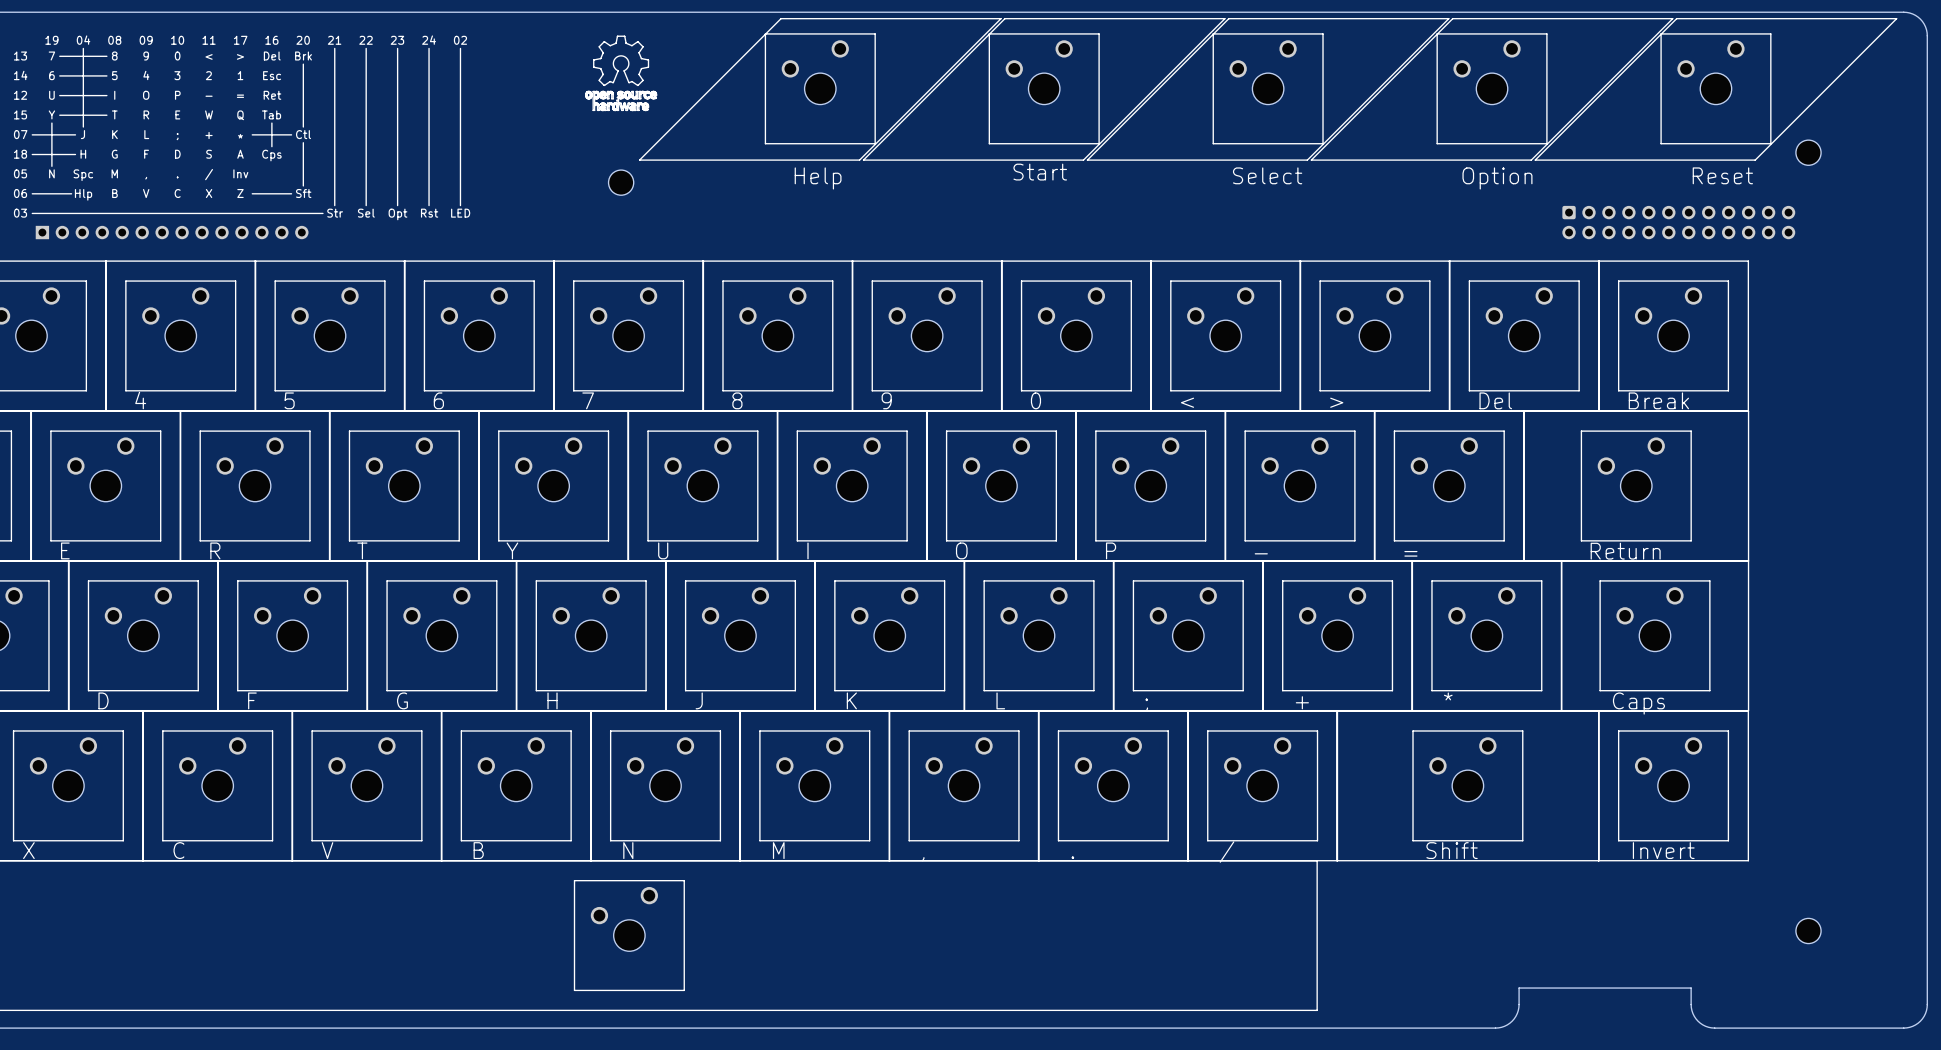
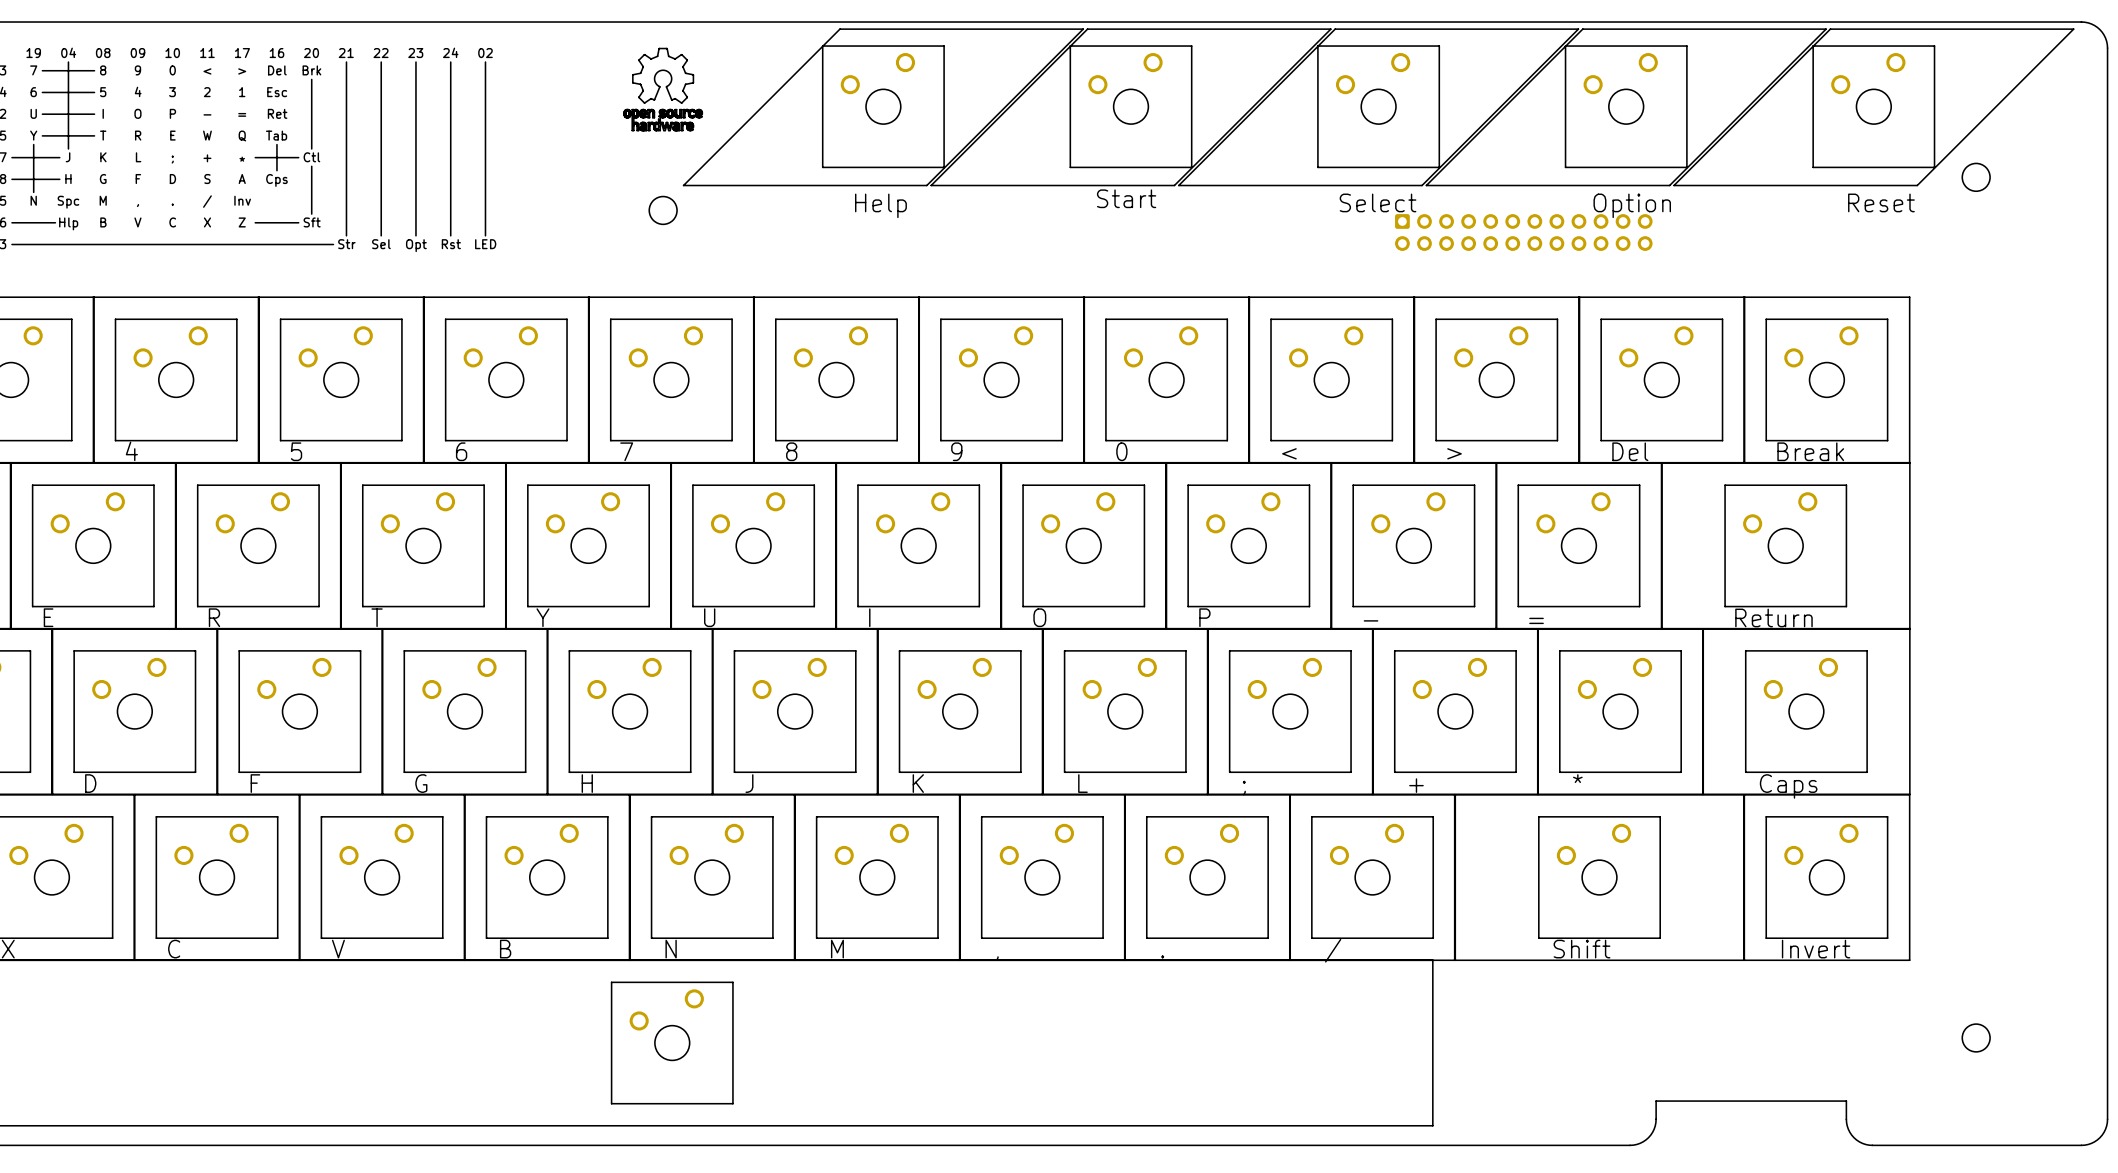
part: none -> (1523, 232)
part: (1678, 222) -> none
part: (172, 232) -> none

